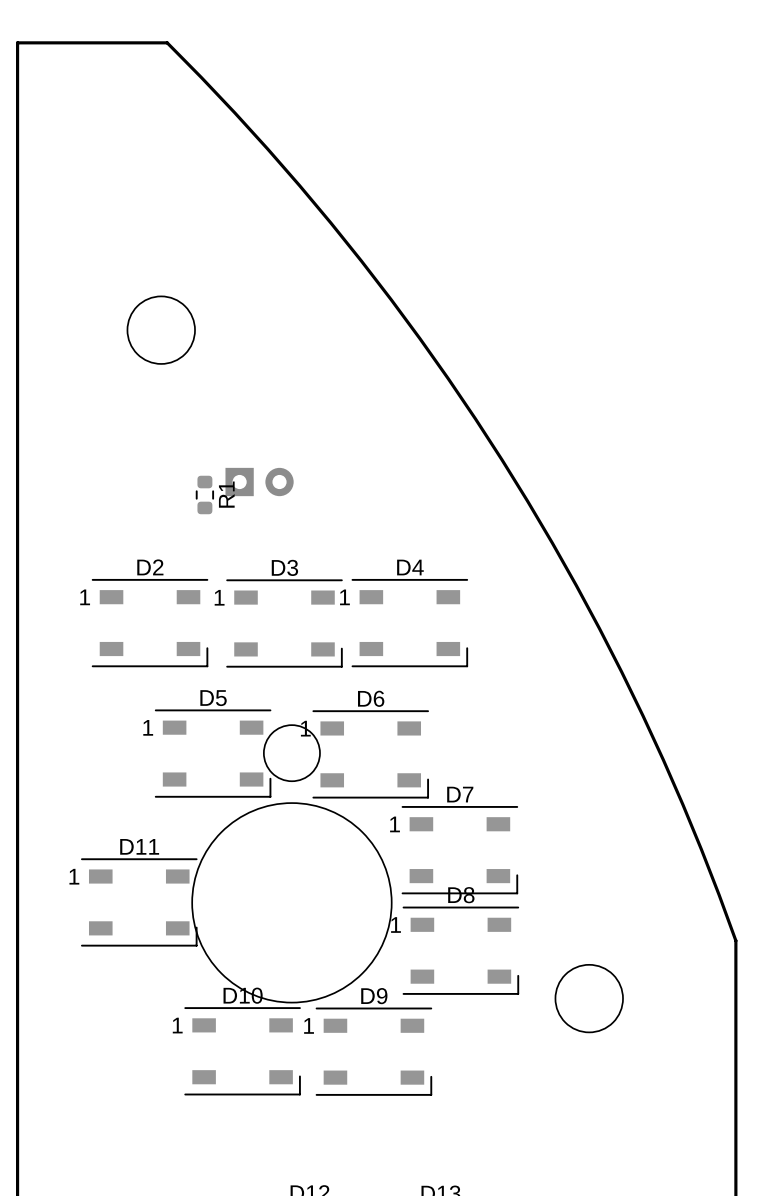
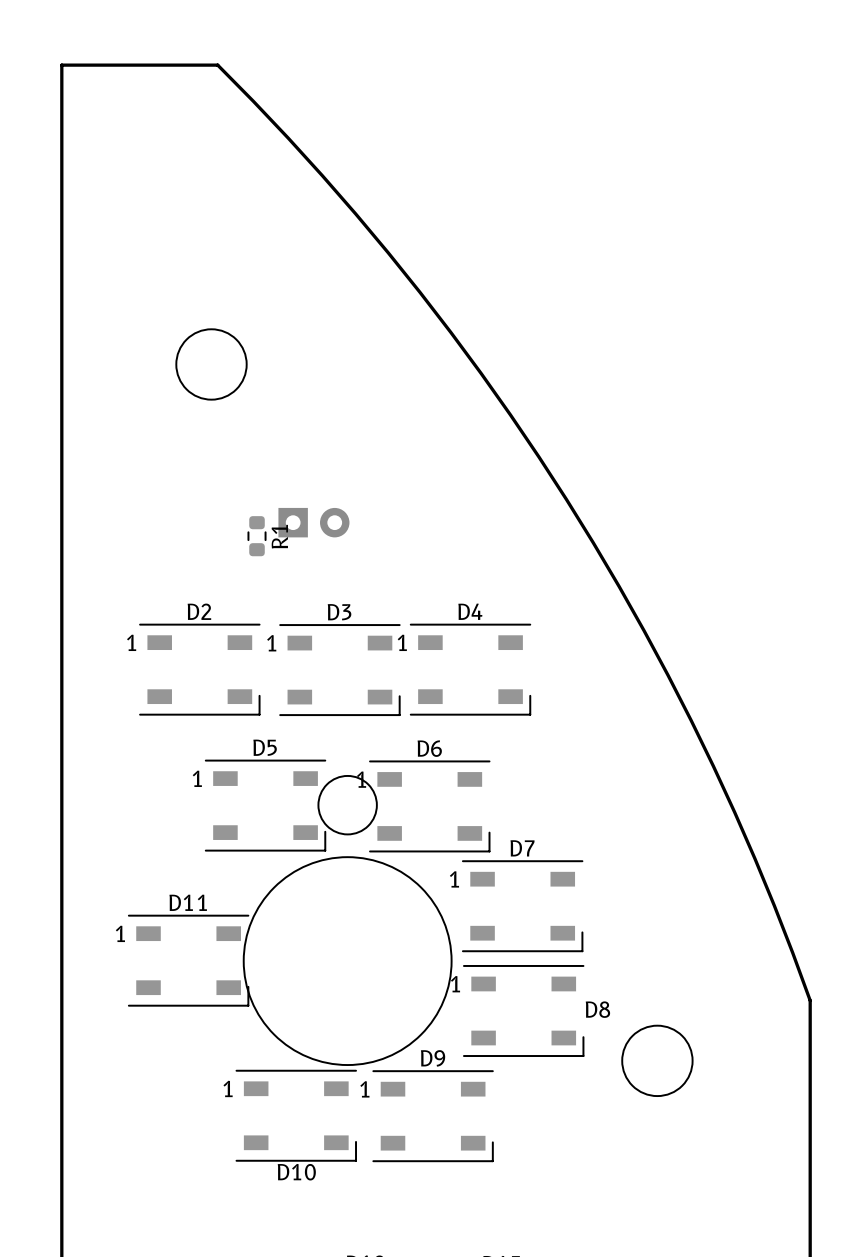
D8 name position: D8 (461, 895) -> D8 (597, 1009)
D10 name position: D10 (243, 995) -> D10 (296, 1172)

